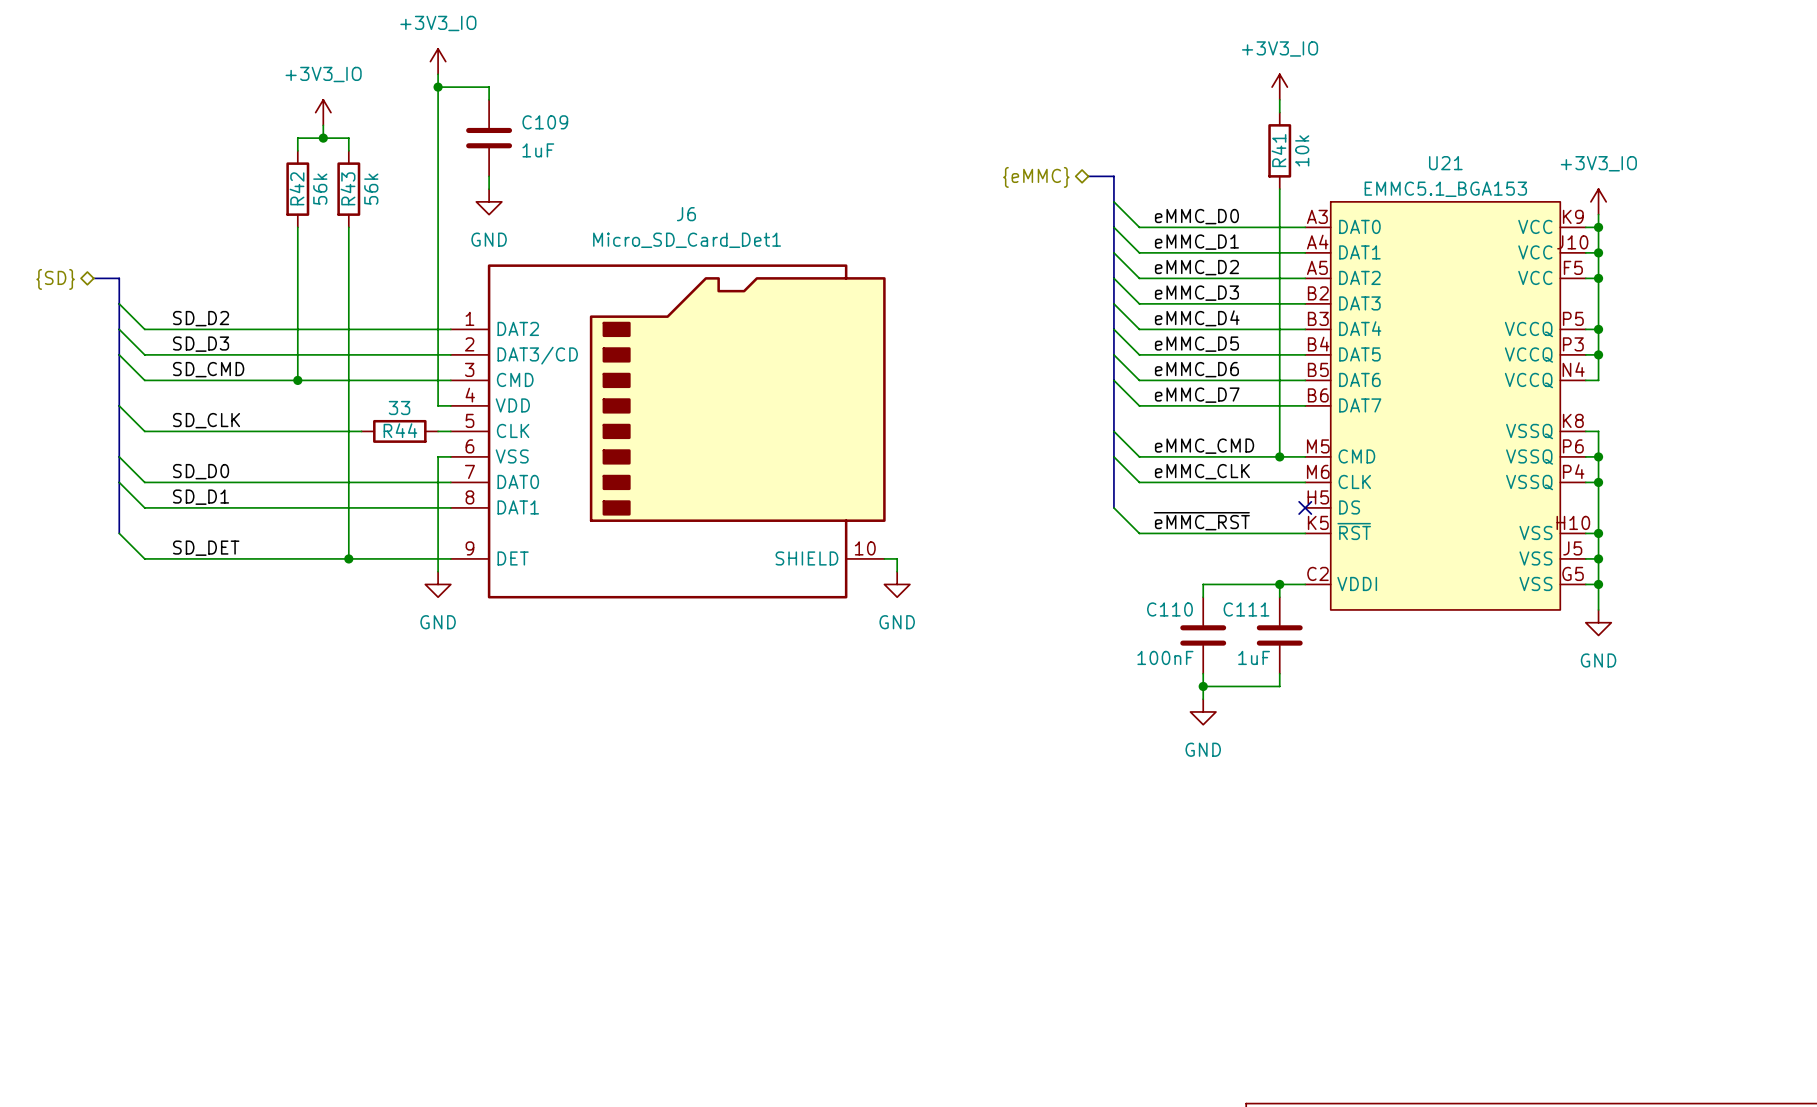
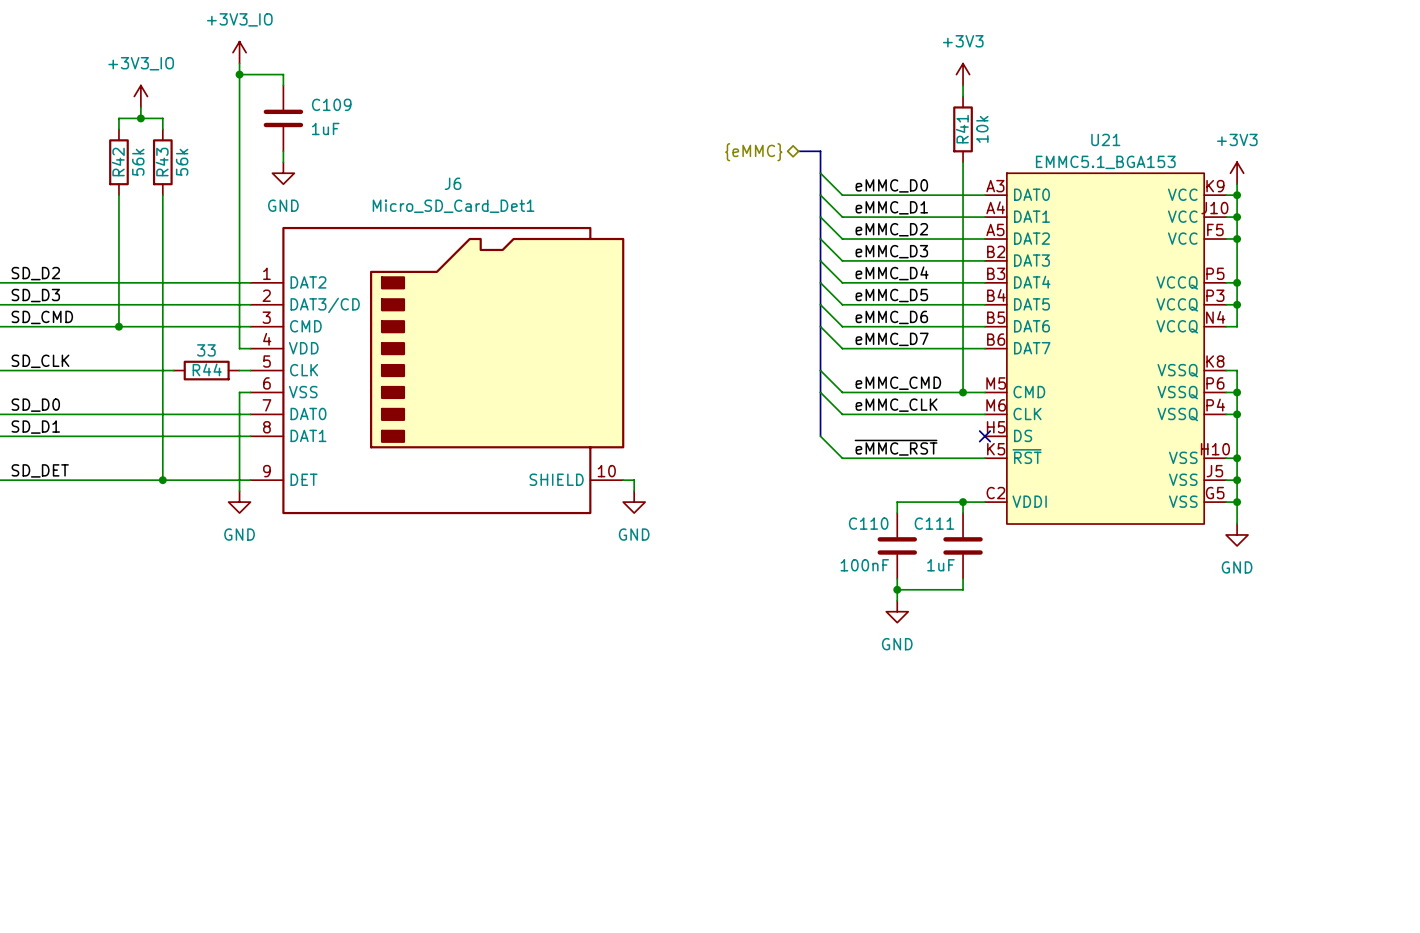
power symbol: +3V3_IO (1279, 87) -> +3V3 (963, 74)
power symbol: +3V3_IO (1598, 201) -> +3V3 (1237, 173)

